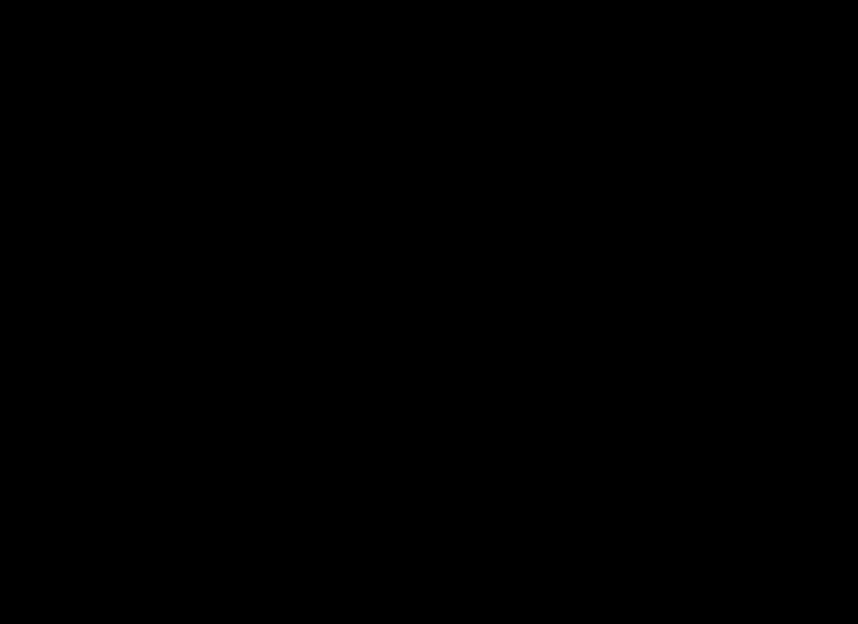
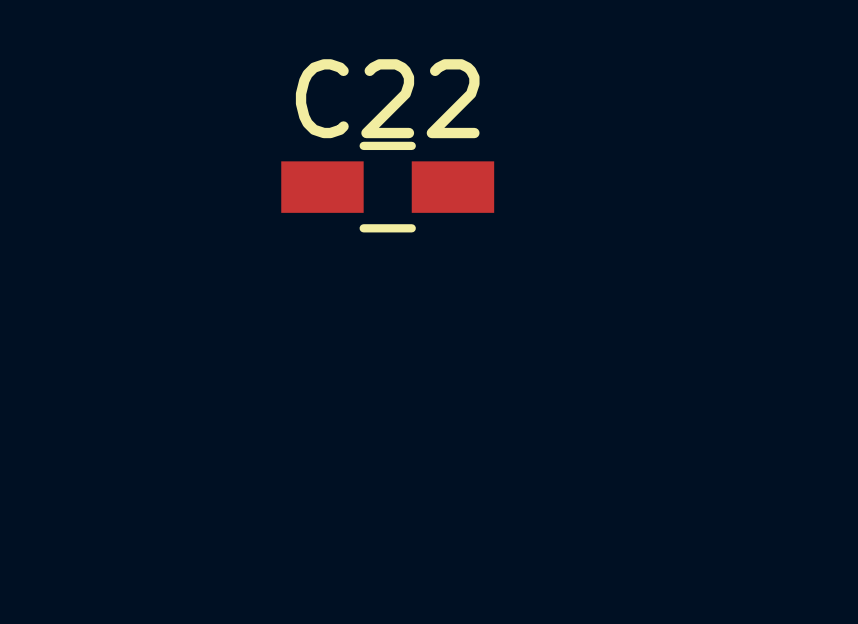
C22: none -> (387, 187)

